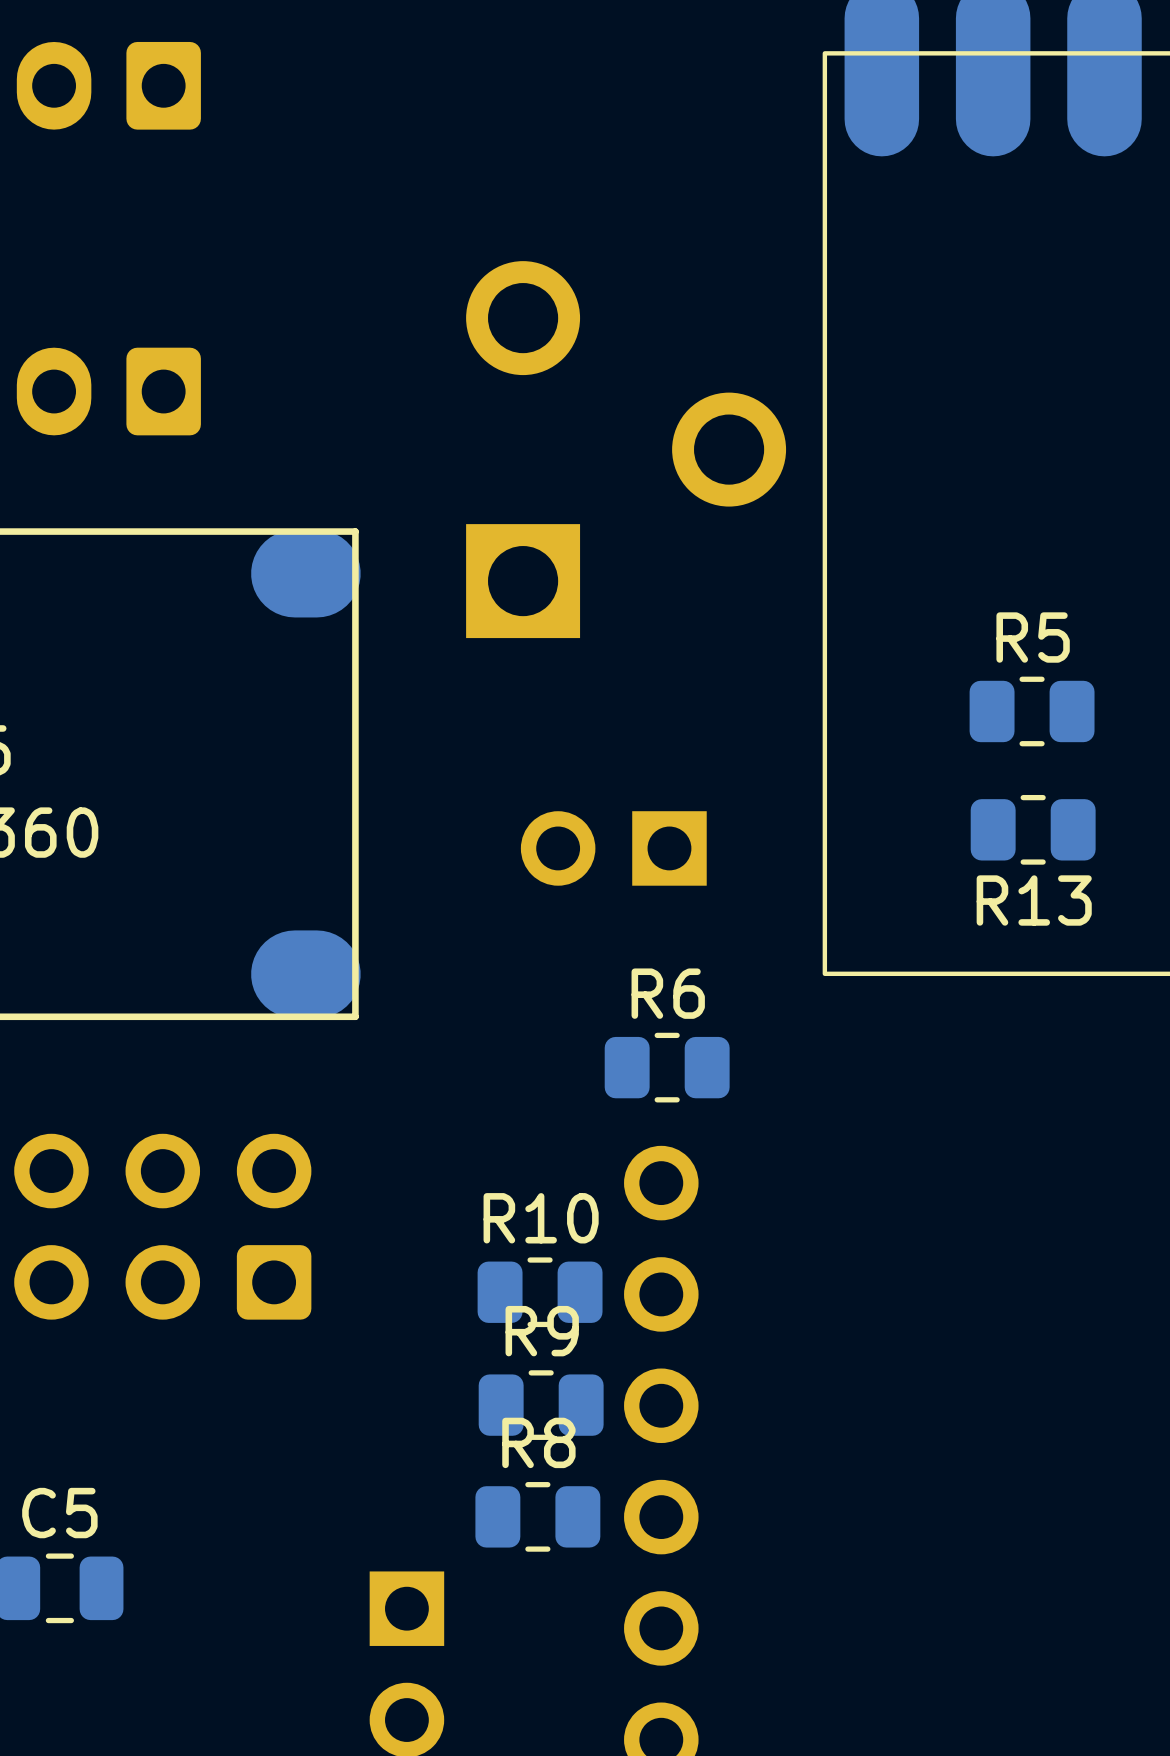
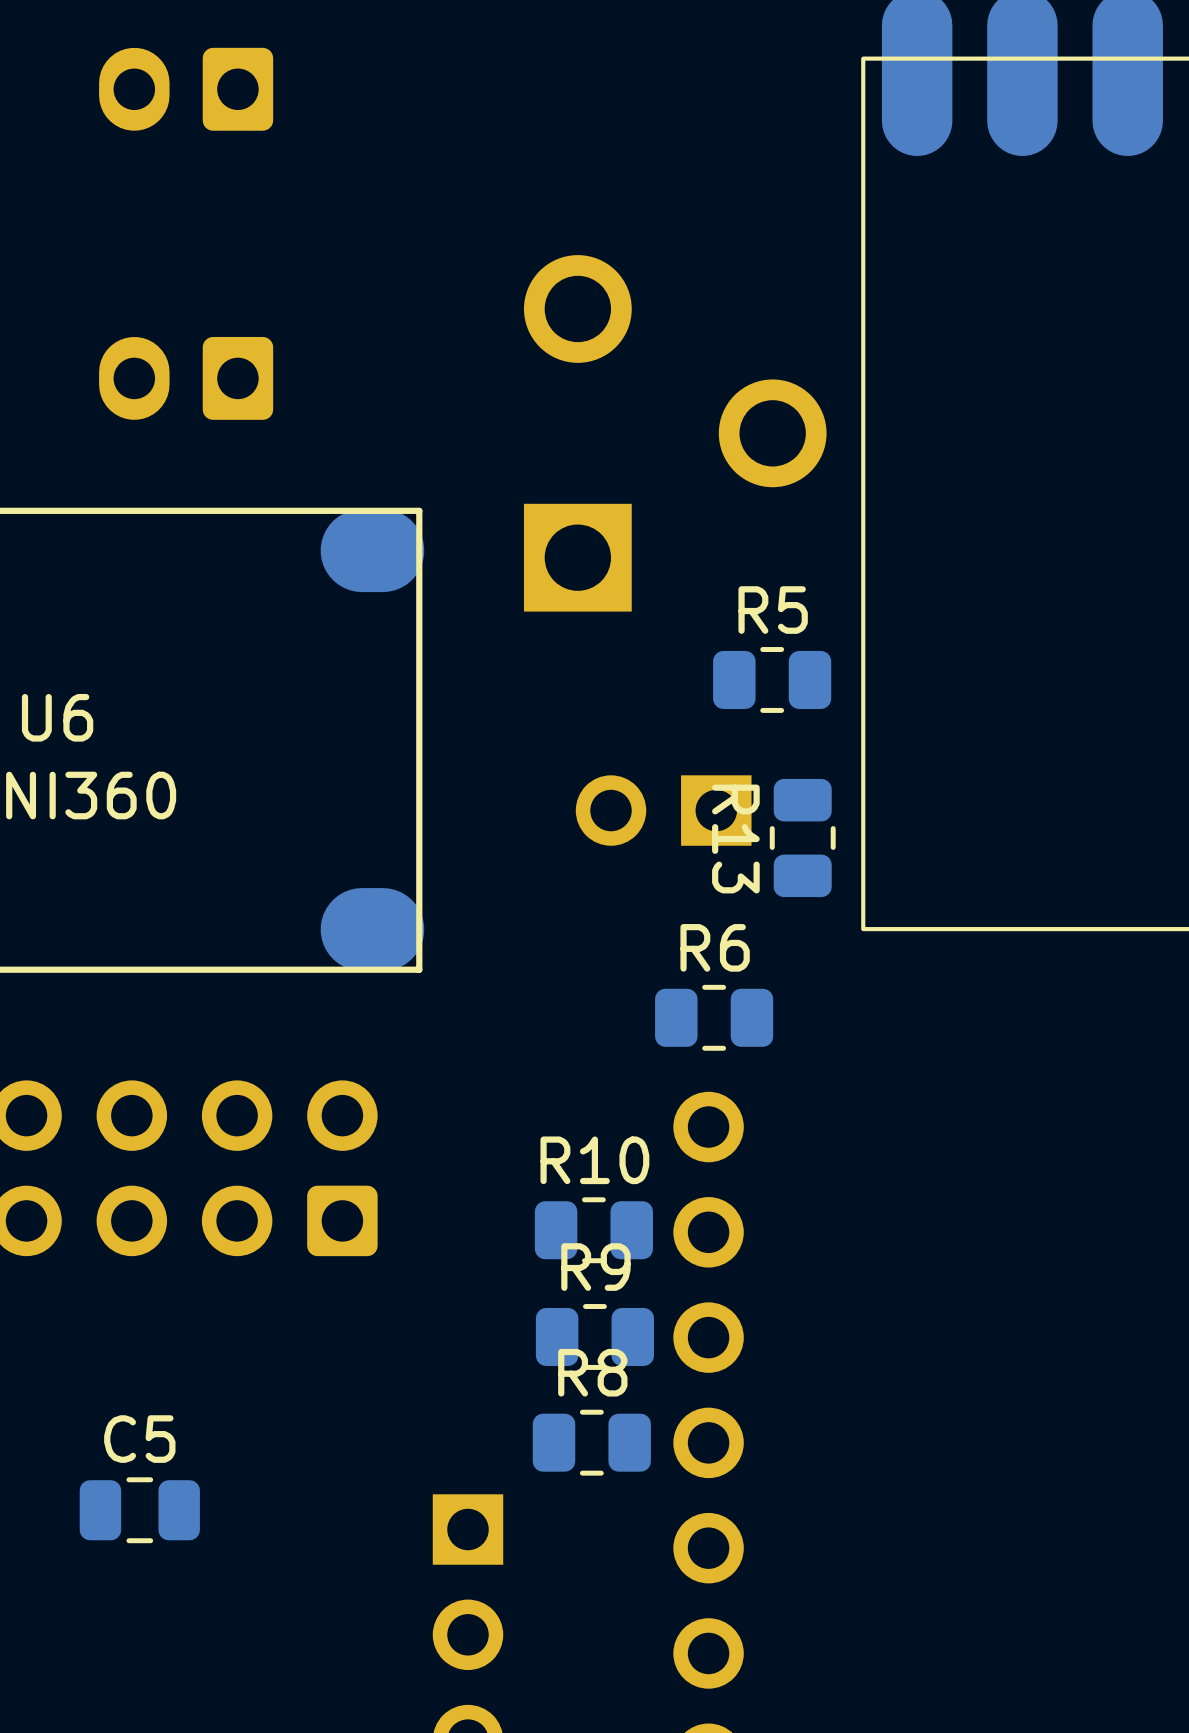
R5 position: (1032, 711) -> (772, 679)
R13 rotation: 0° (1033, 829) -> 90° clockwise (802, 838)
R13 position: (1033, 829) -> (802, 838)

